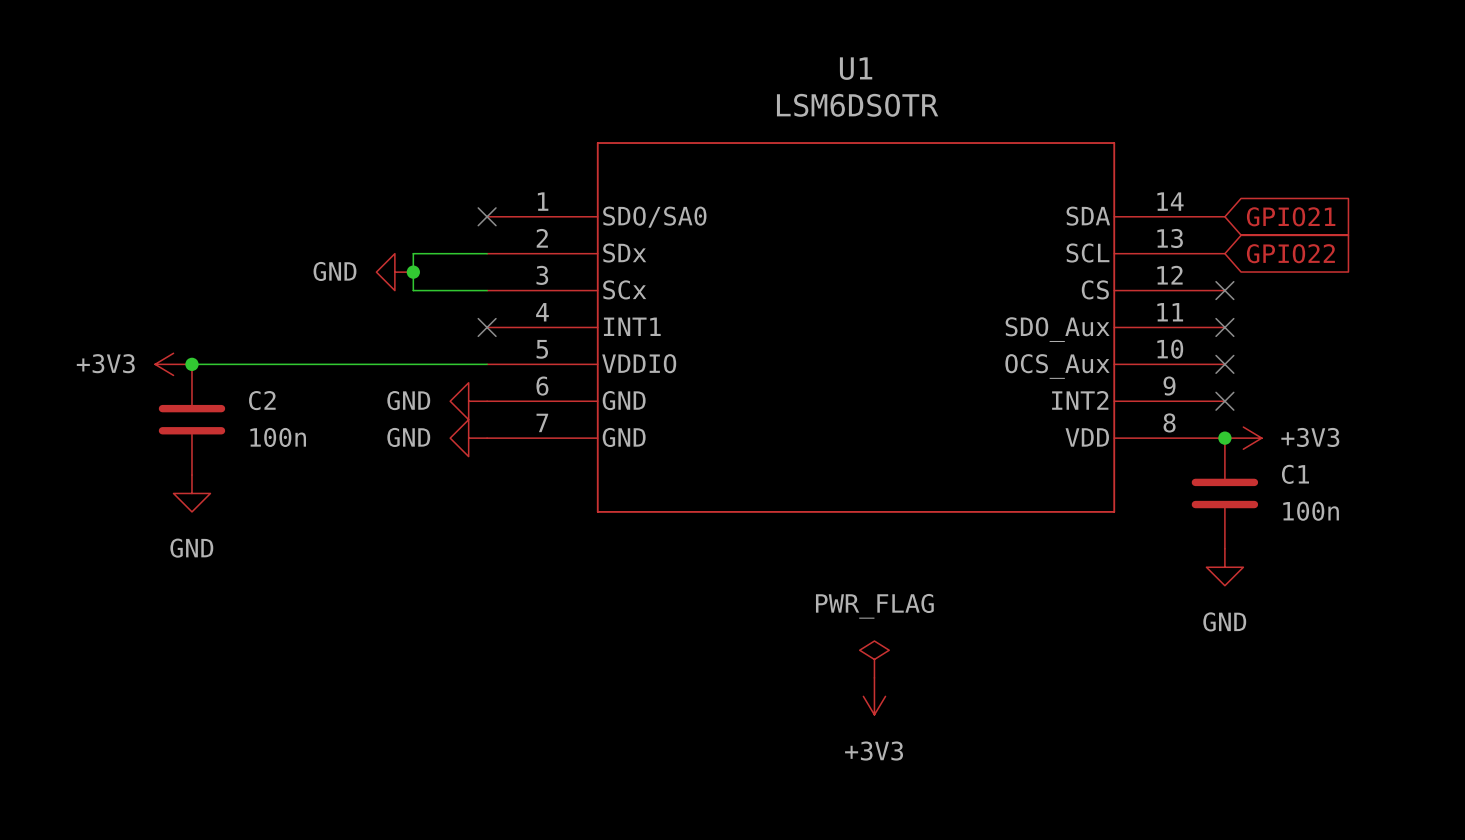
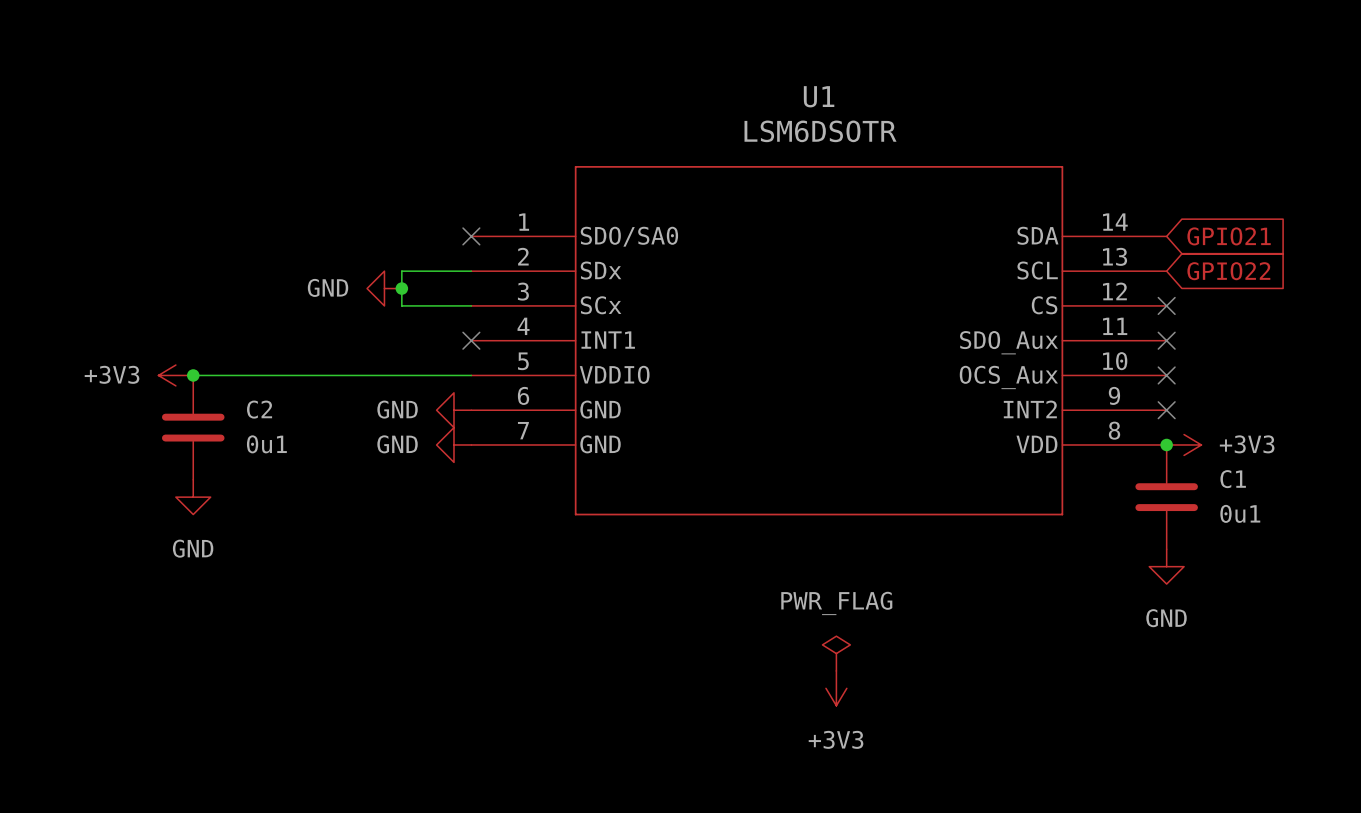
C2 value: 100n (278, 437) -> 0u1 (266, 444)
C1 value: 100n (1311, 511) -> 0u1 (1240, 513)

